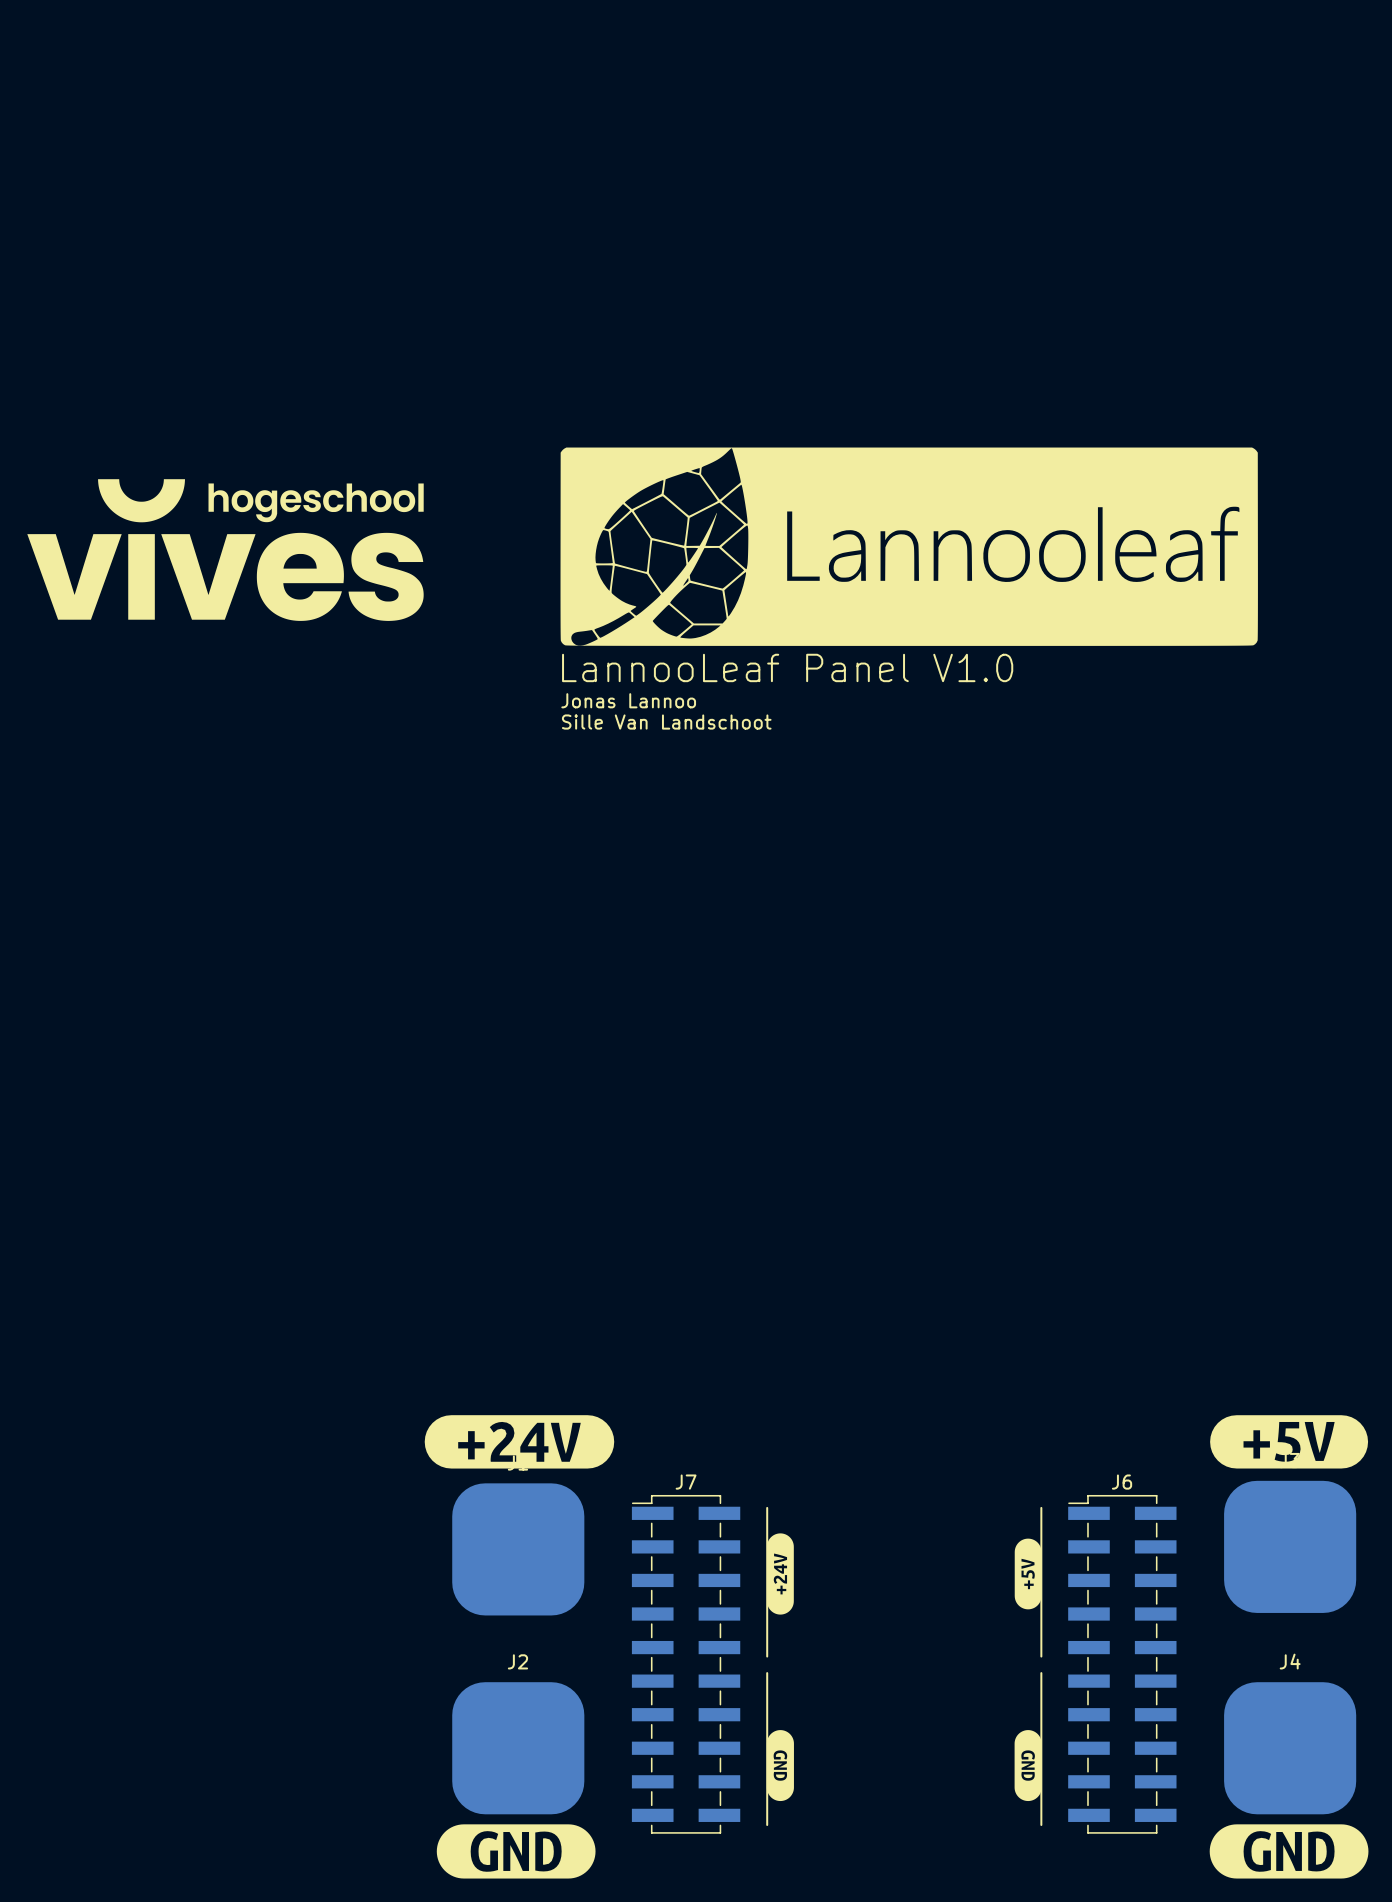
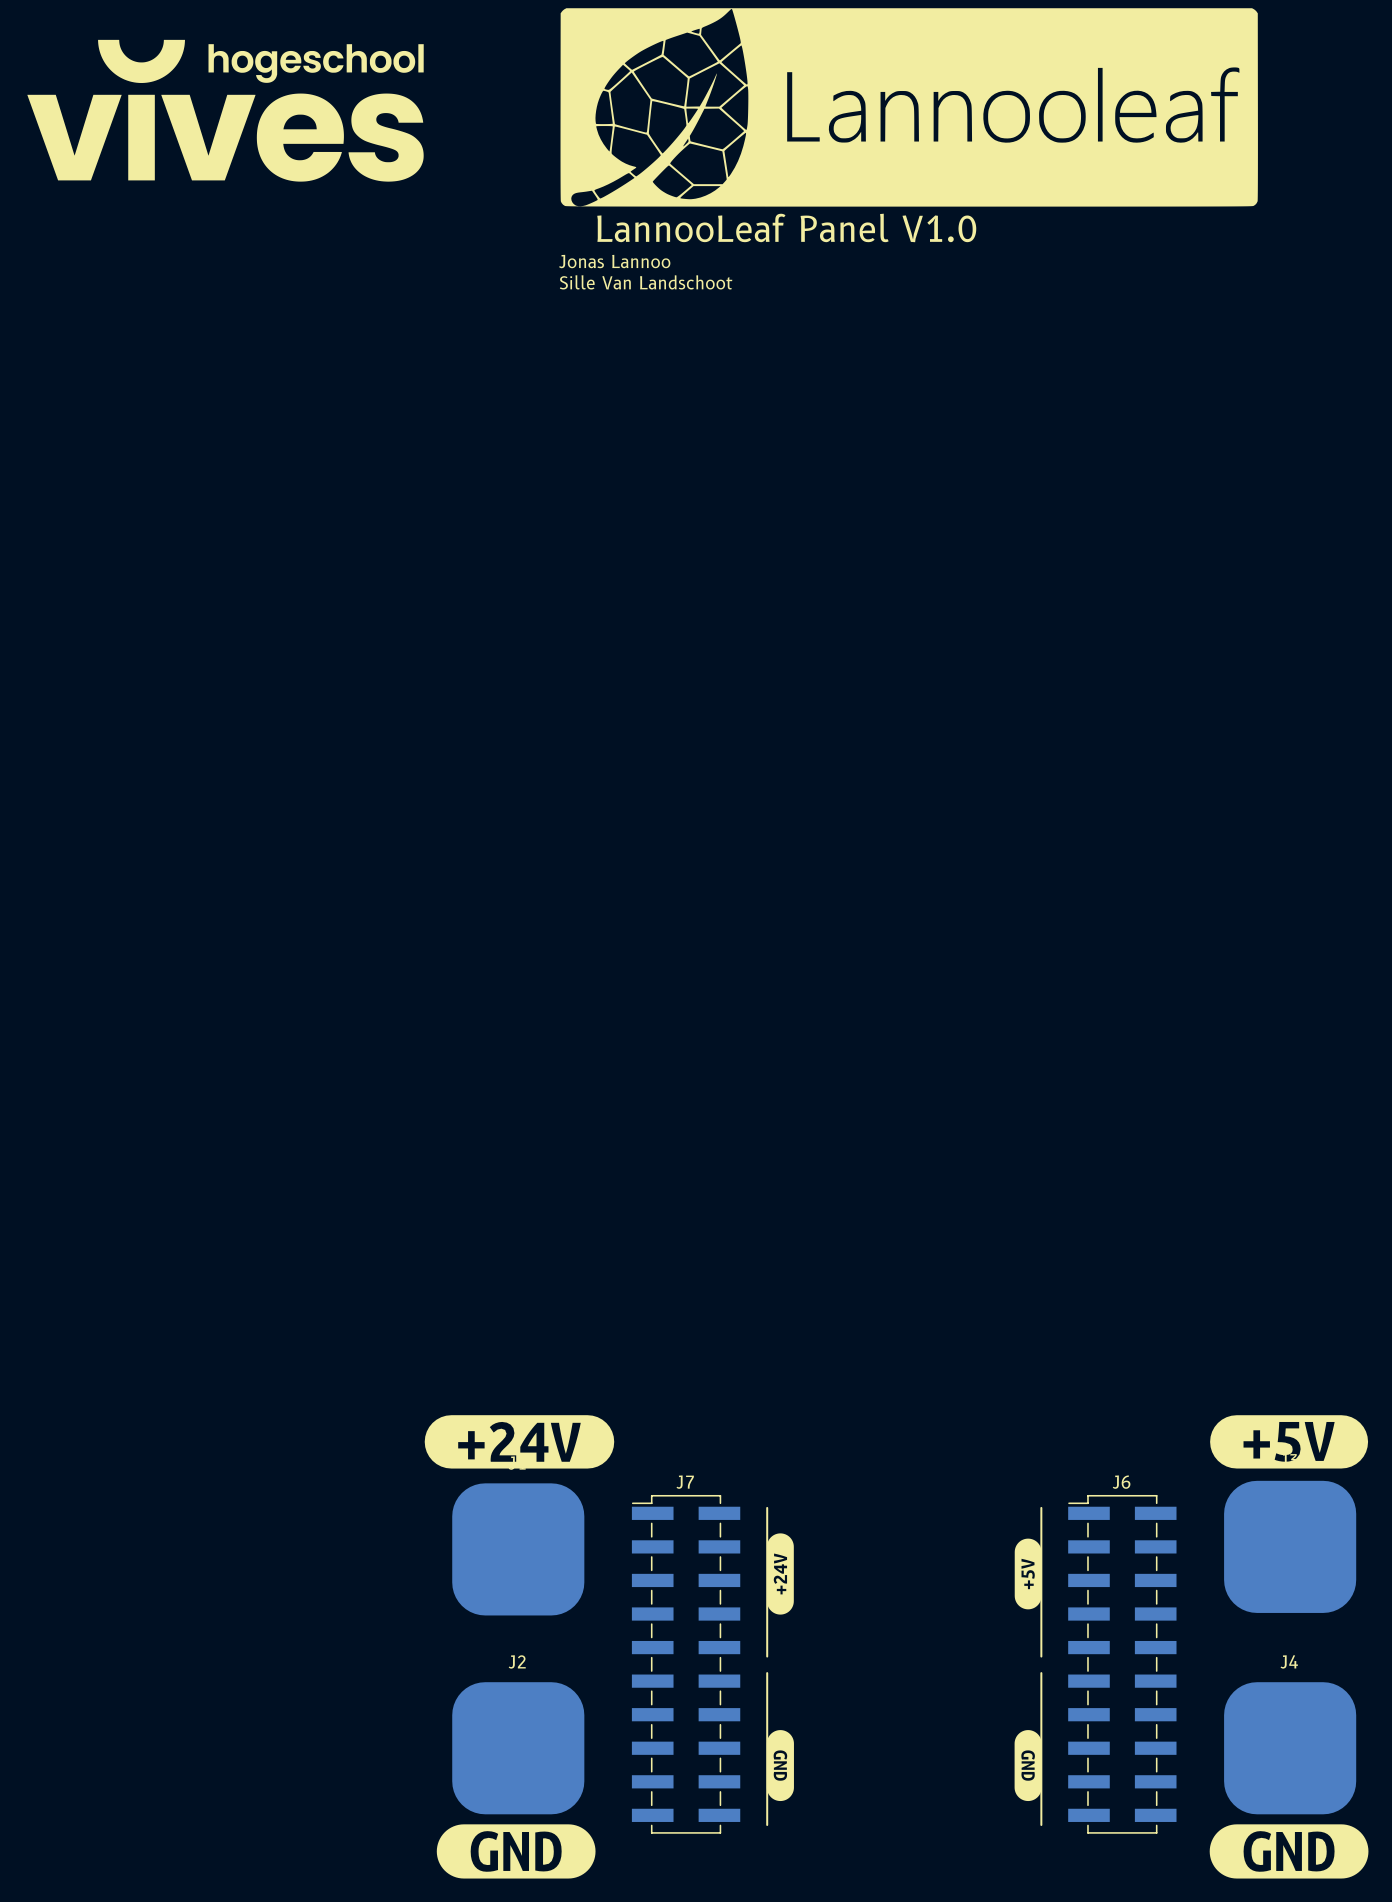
drawing: none -> [560, 8, 1258, 207]
drawing: none -> [27, 39, 424, 182]
text: none -> LannooLeaf Panel V1.0 (786, 227)
text: none -> Jonas Lannoo (614, 261)
text: none -> Sille Van Landschoot (646, 282)
drawing: [560, 447, 1258, 646] -> none
drawing: [27, 479, 424, 621] -> none
text: LannooLeaf Panel V1.0 (787, 667) -> none
text: Jonas Lannoo (628, 700) -> none
text: Sille Van Landschoot (666, 722) -> none

